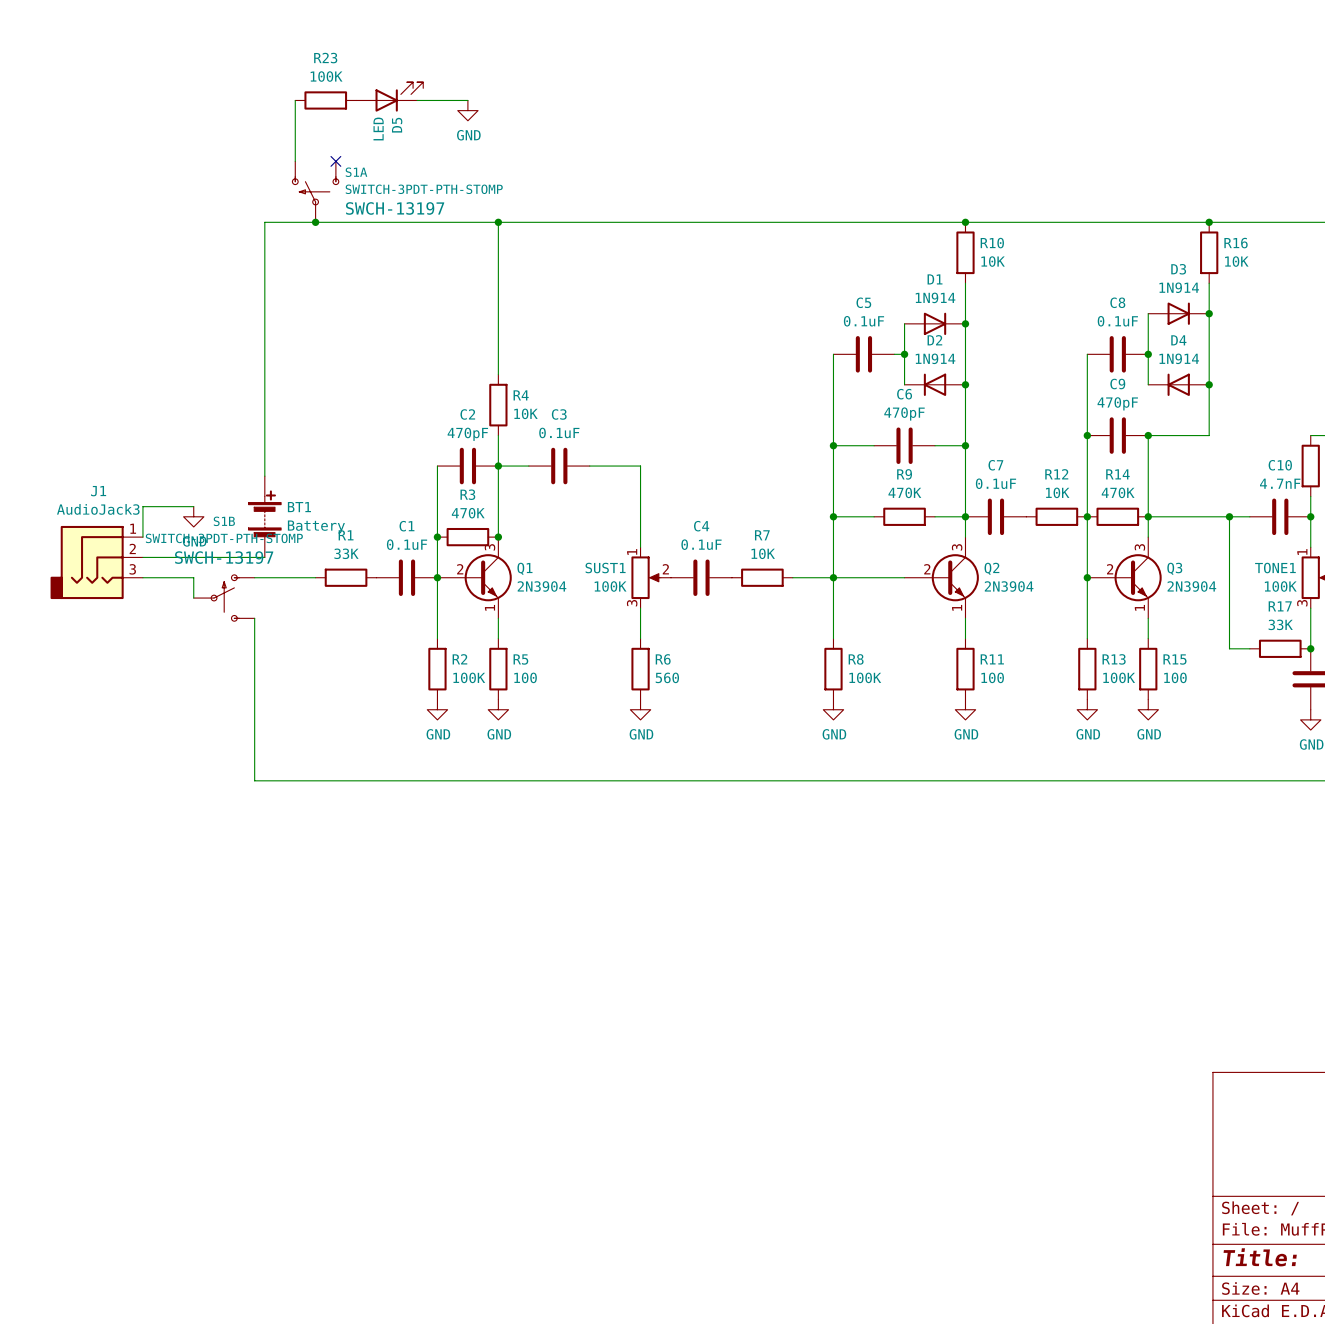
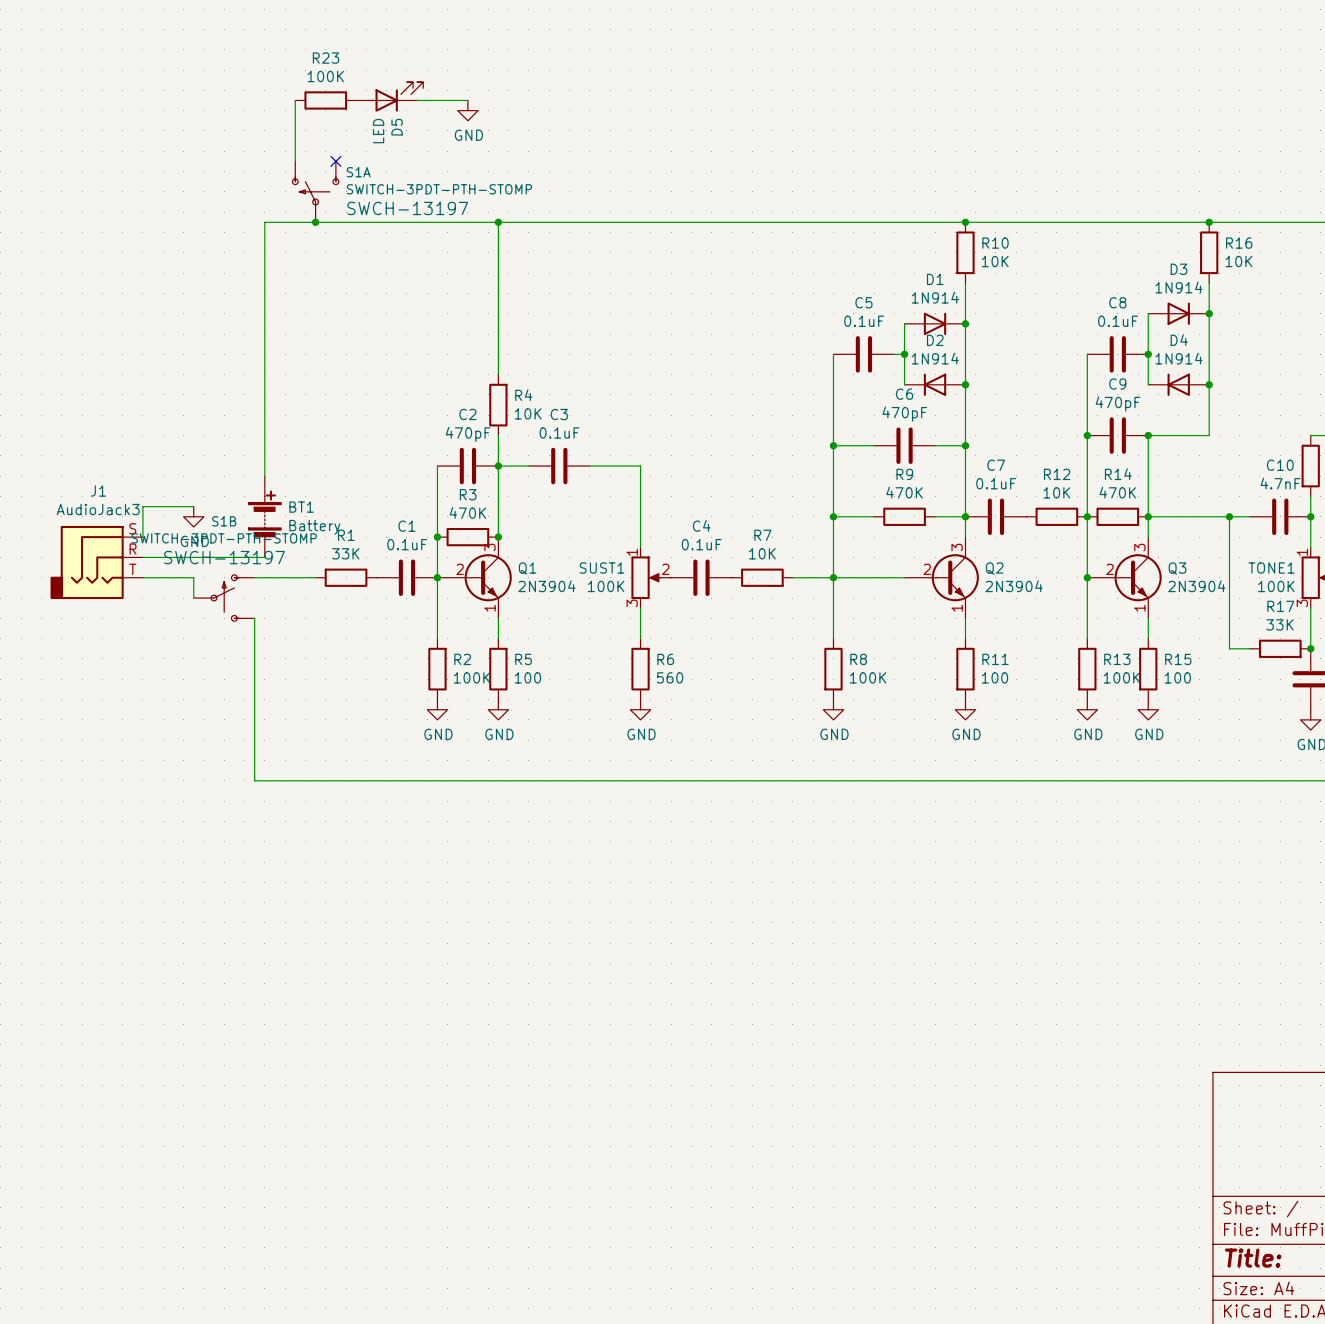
J1 pin number: 1 (133, 528) -> S (132, 528)
J1 pin number: 2 (132, 548) -> R (133, 549)
J1 pin number: 3 (132, 569) -> T (132, 569)

